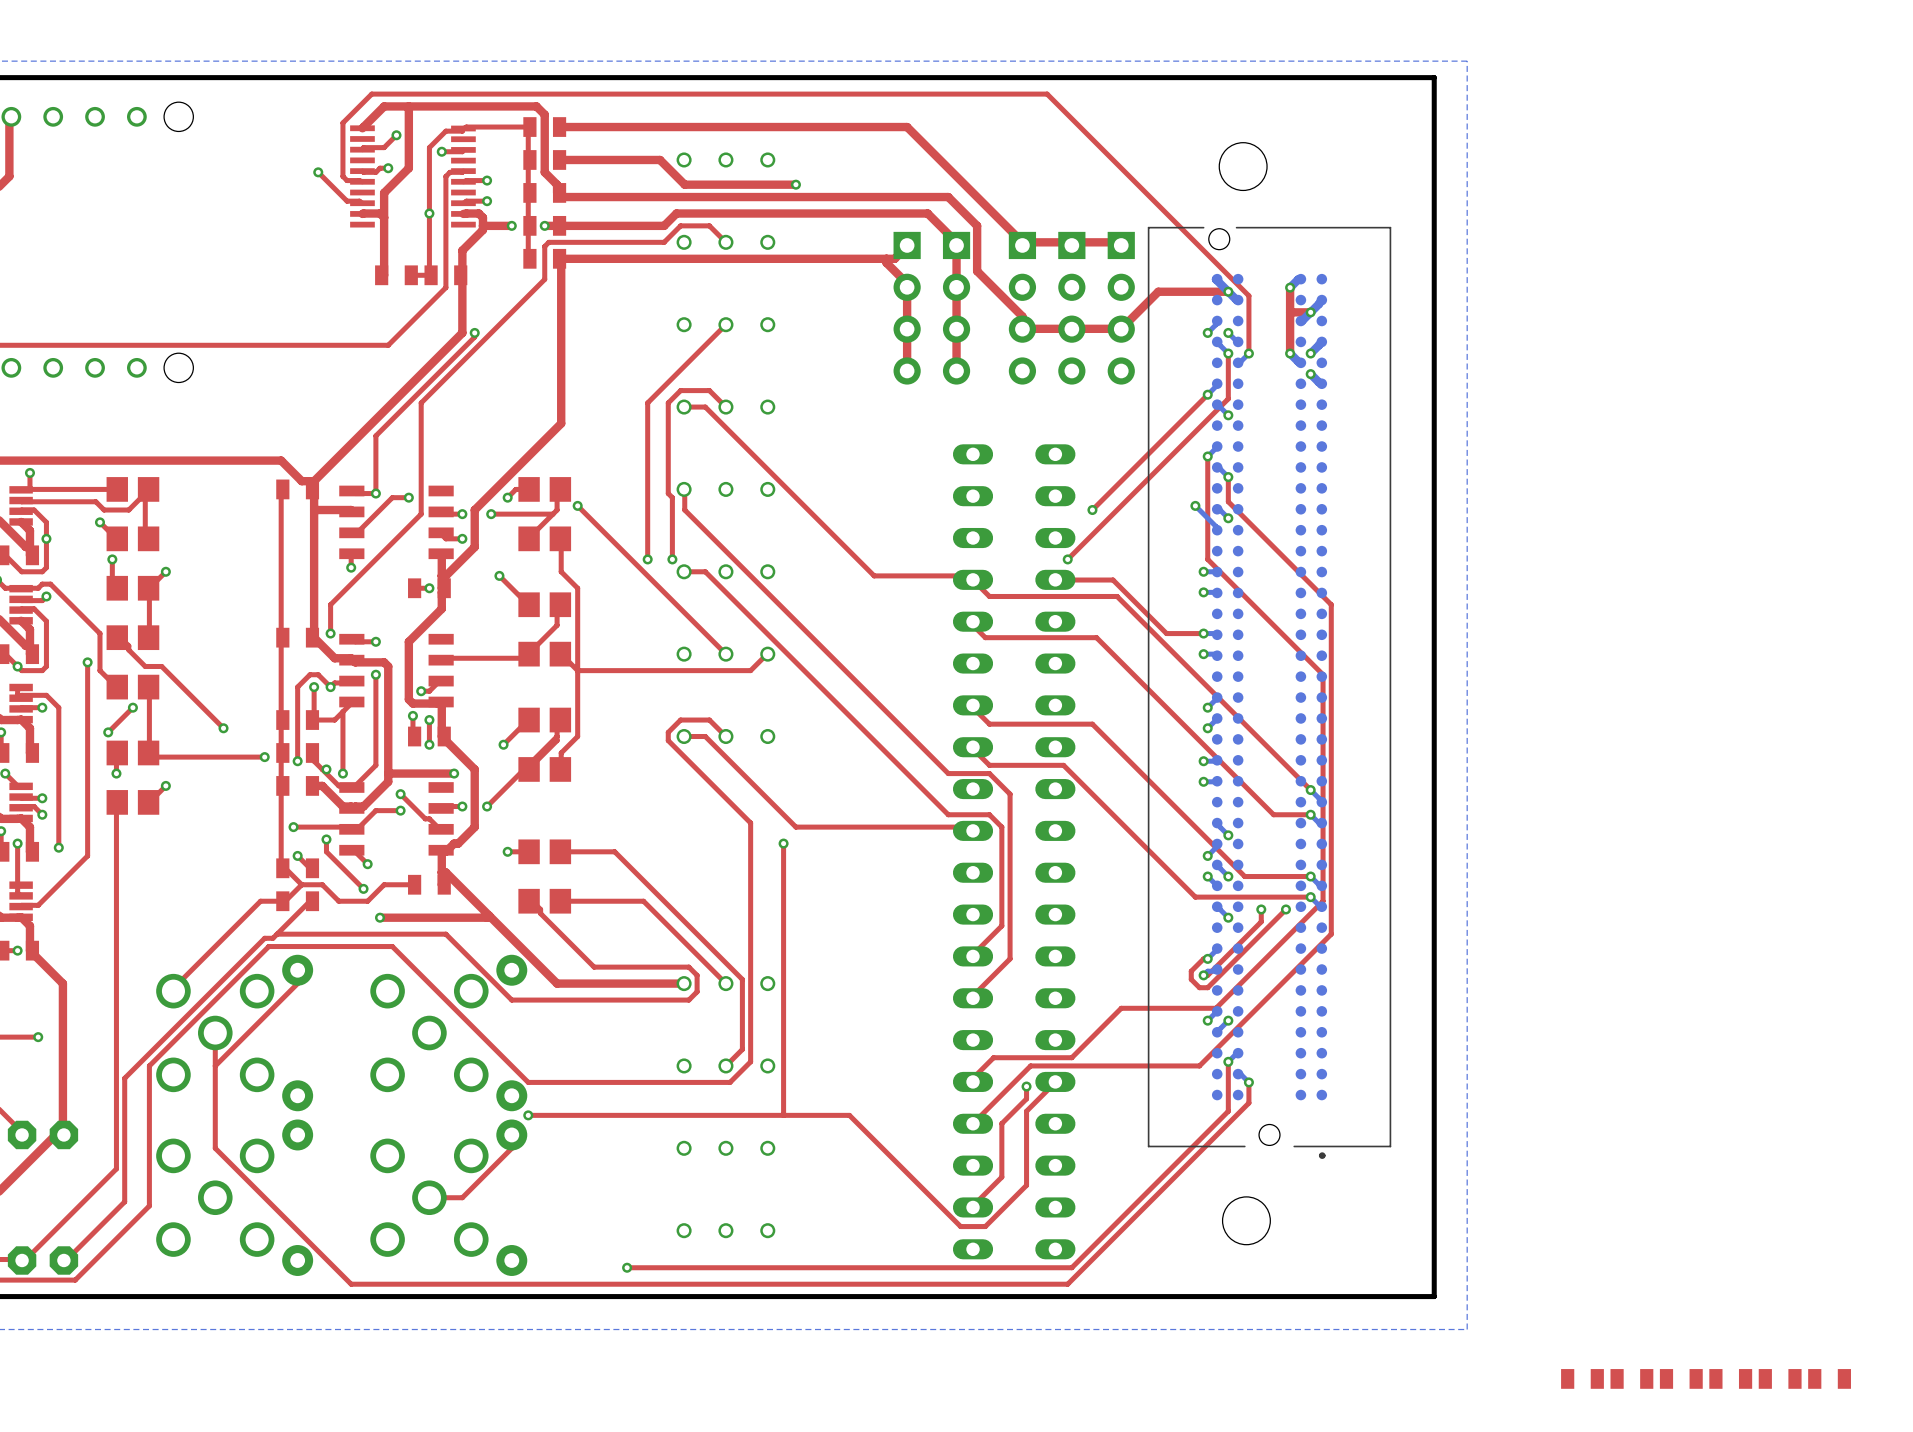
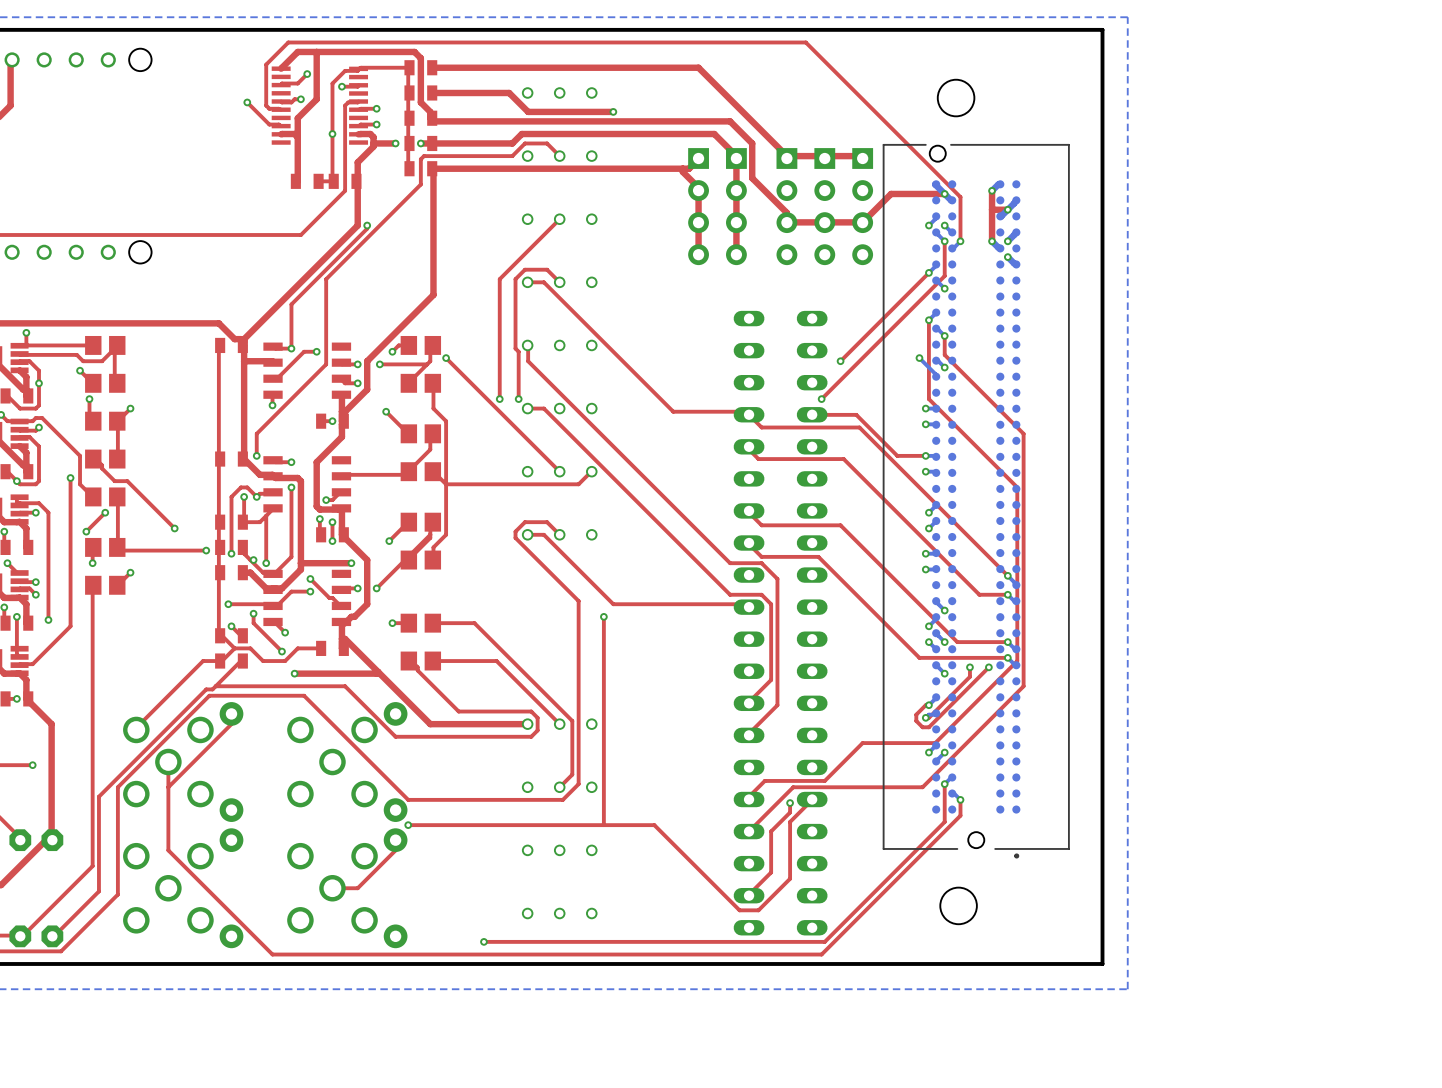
part: (1582, 1378) -> none
part: (1631, 1378) -> none
part: (1681, 1378) -> none
part: (1730, 1378) -> none
part: (1780, 1378) -> none
part: (1829, 1378) -> none

